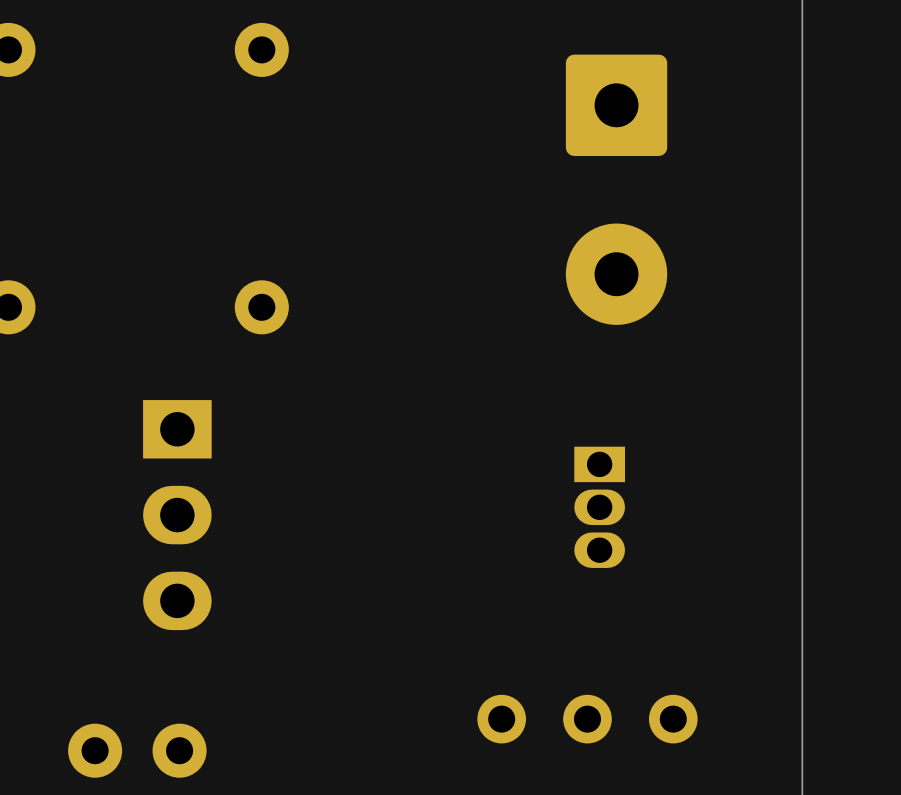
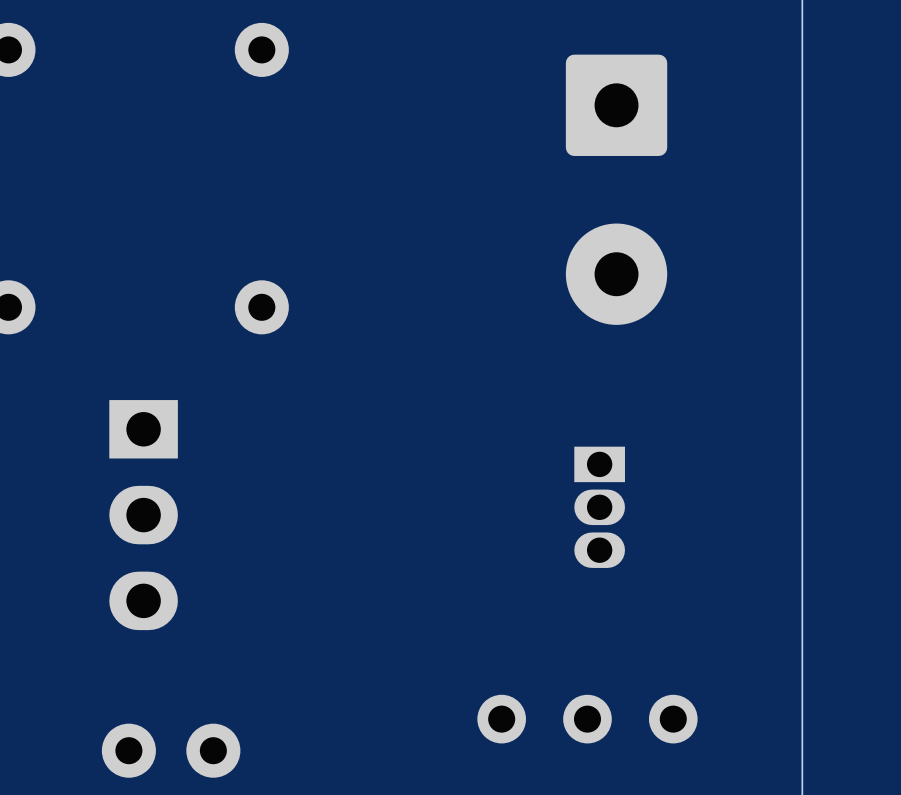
part position: (177, 515) -> (143, 515)
part position: (137, 750) -> (171, 750)

